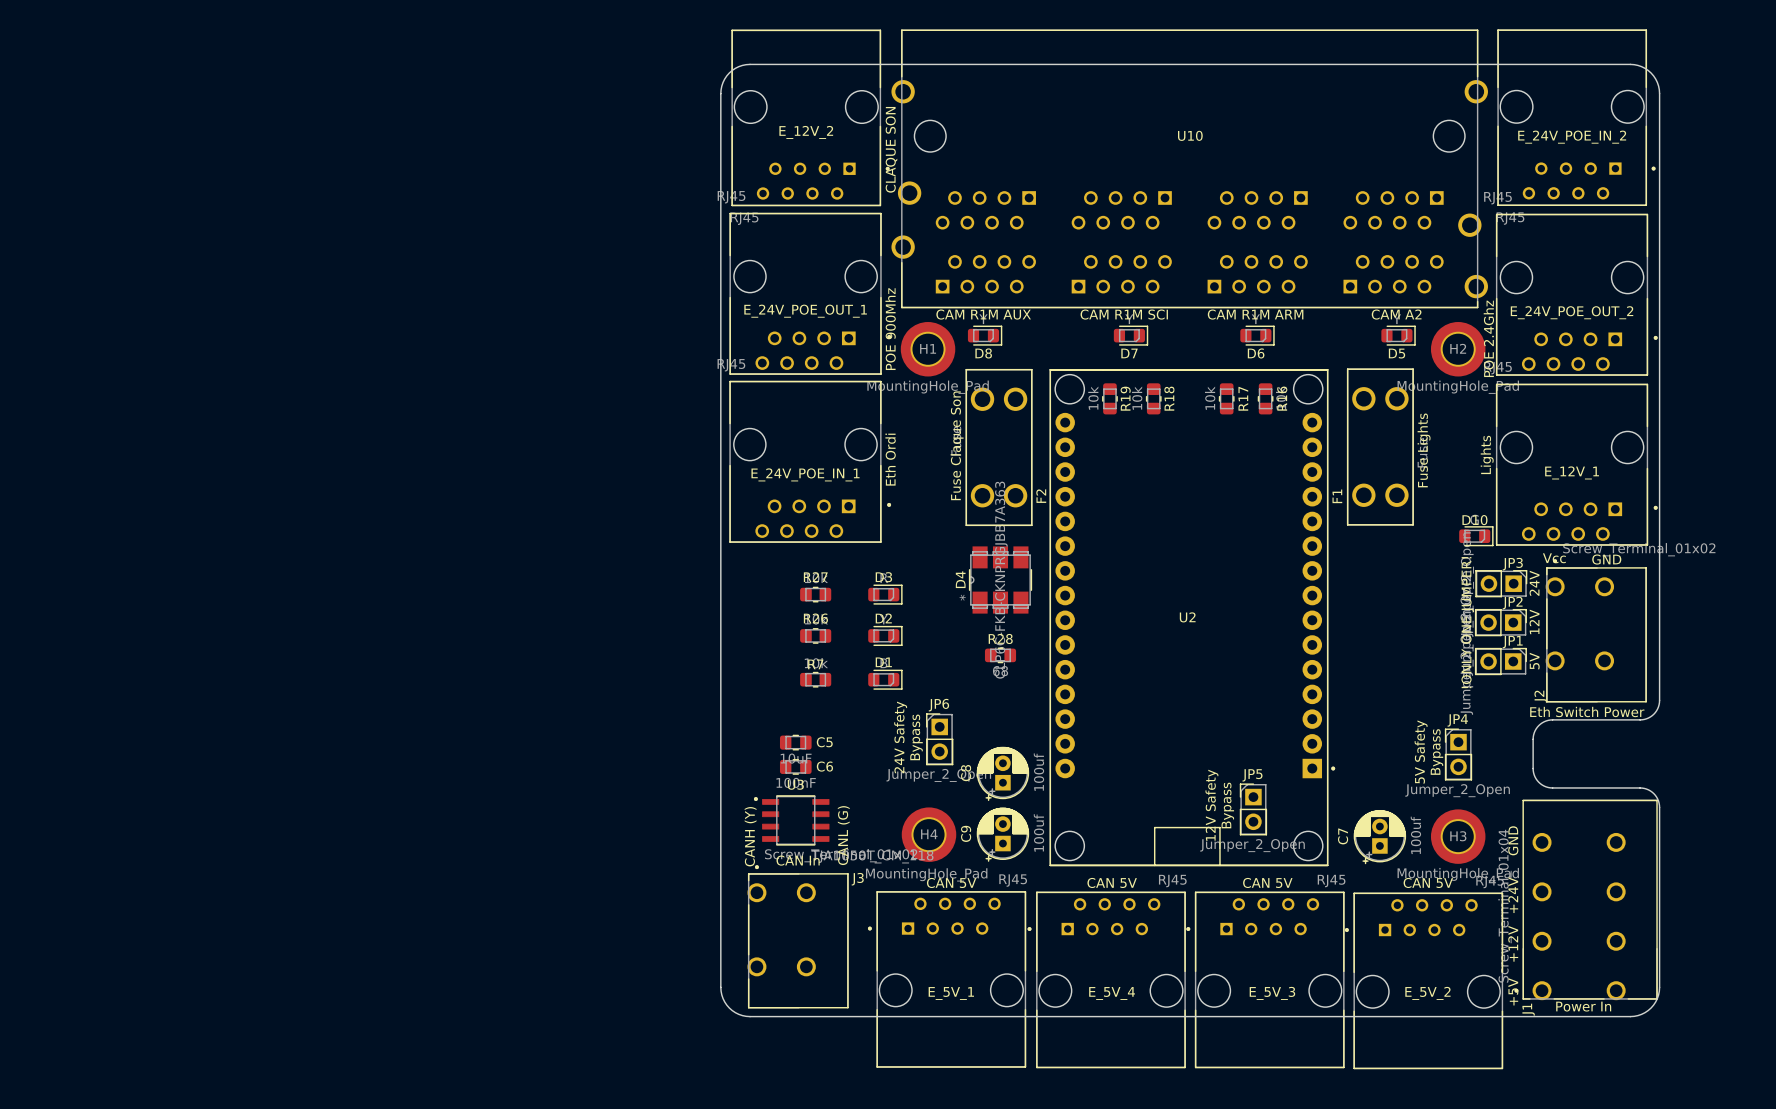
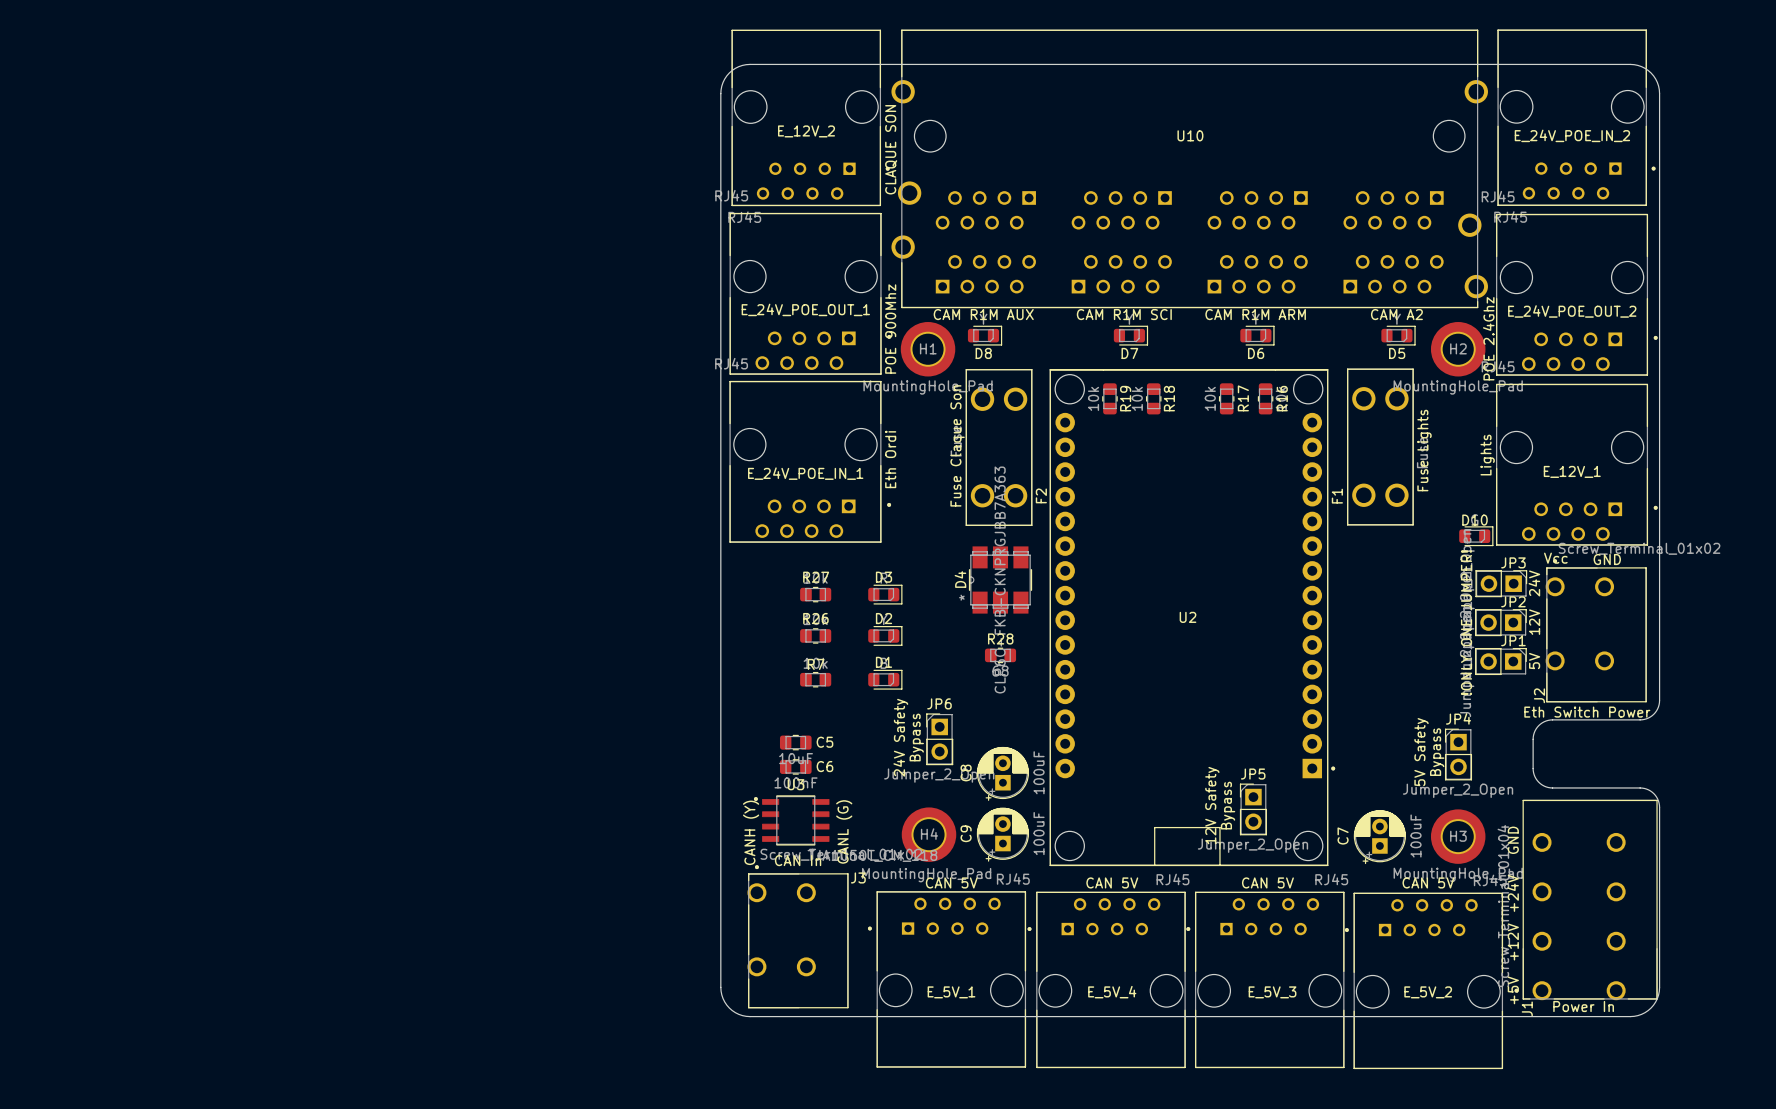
C8 value: 100uf (1038, 772) -> 100uF (1039, 772)
C9 value: 100uf (1038, 832) -> 100uF (1039, 833)
C7 value: 100uf (1415, 835) -> 100uF (1416, 836)

